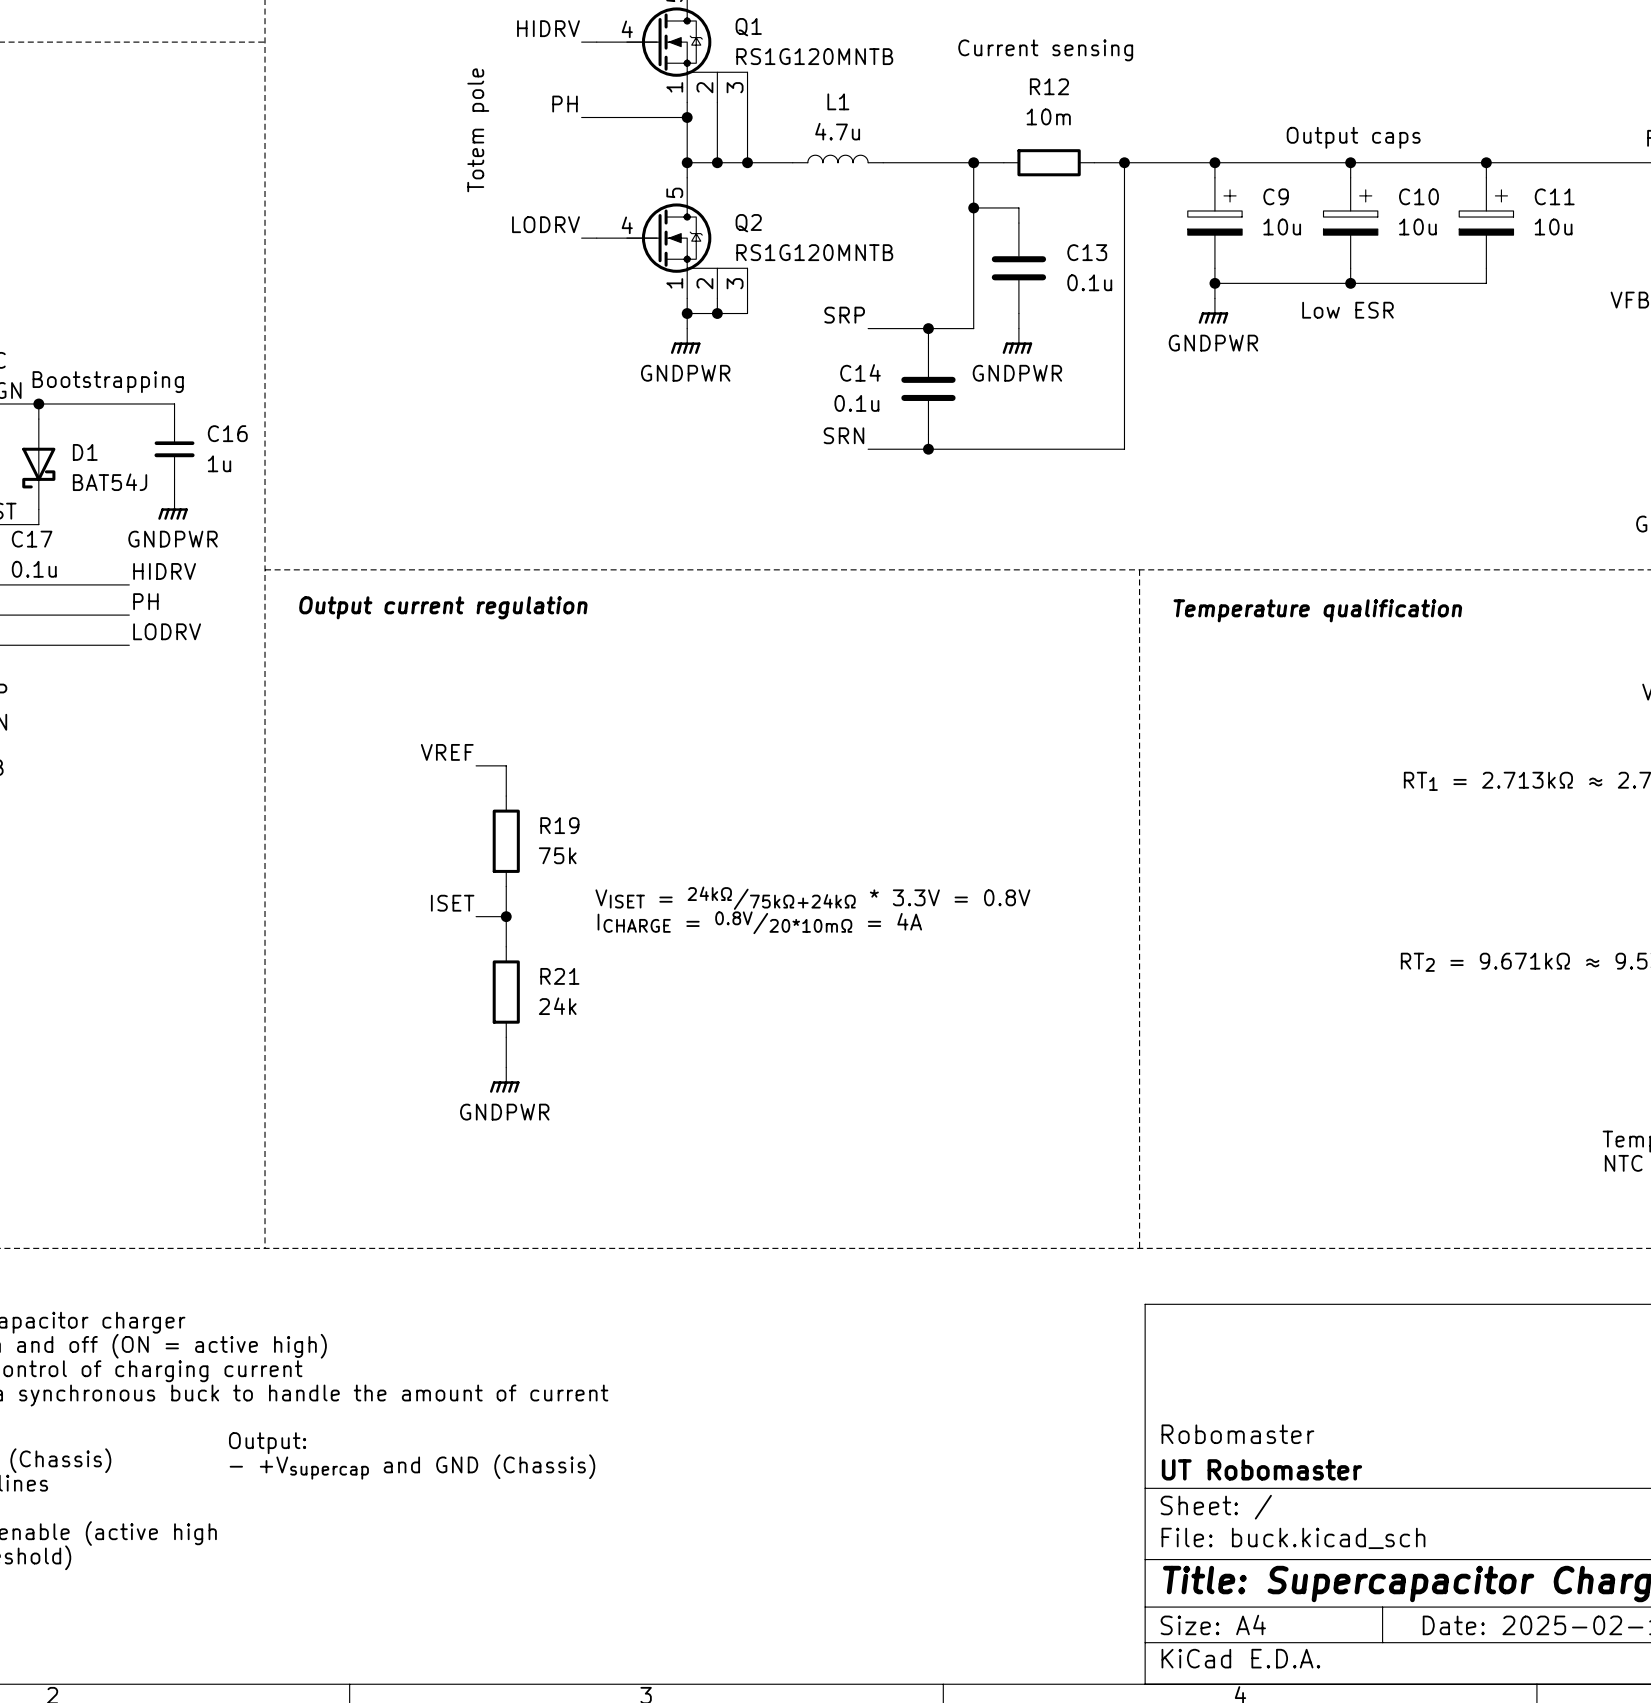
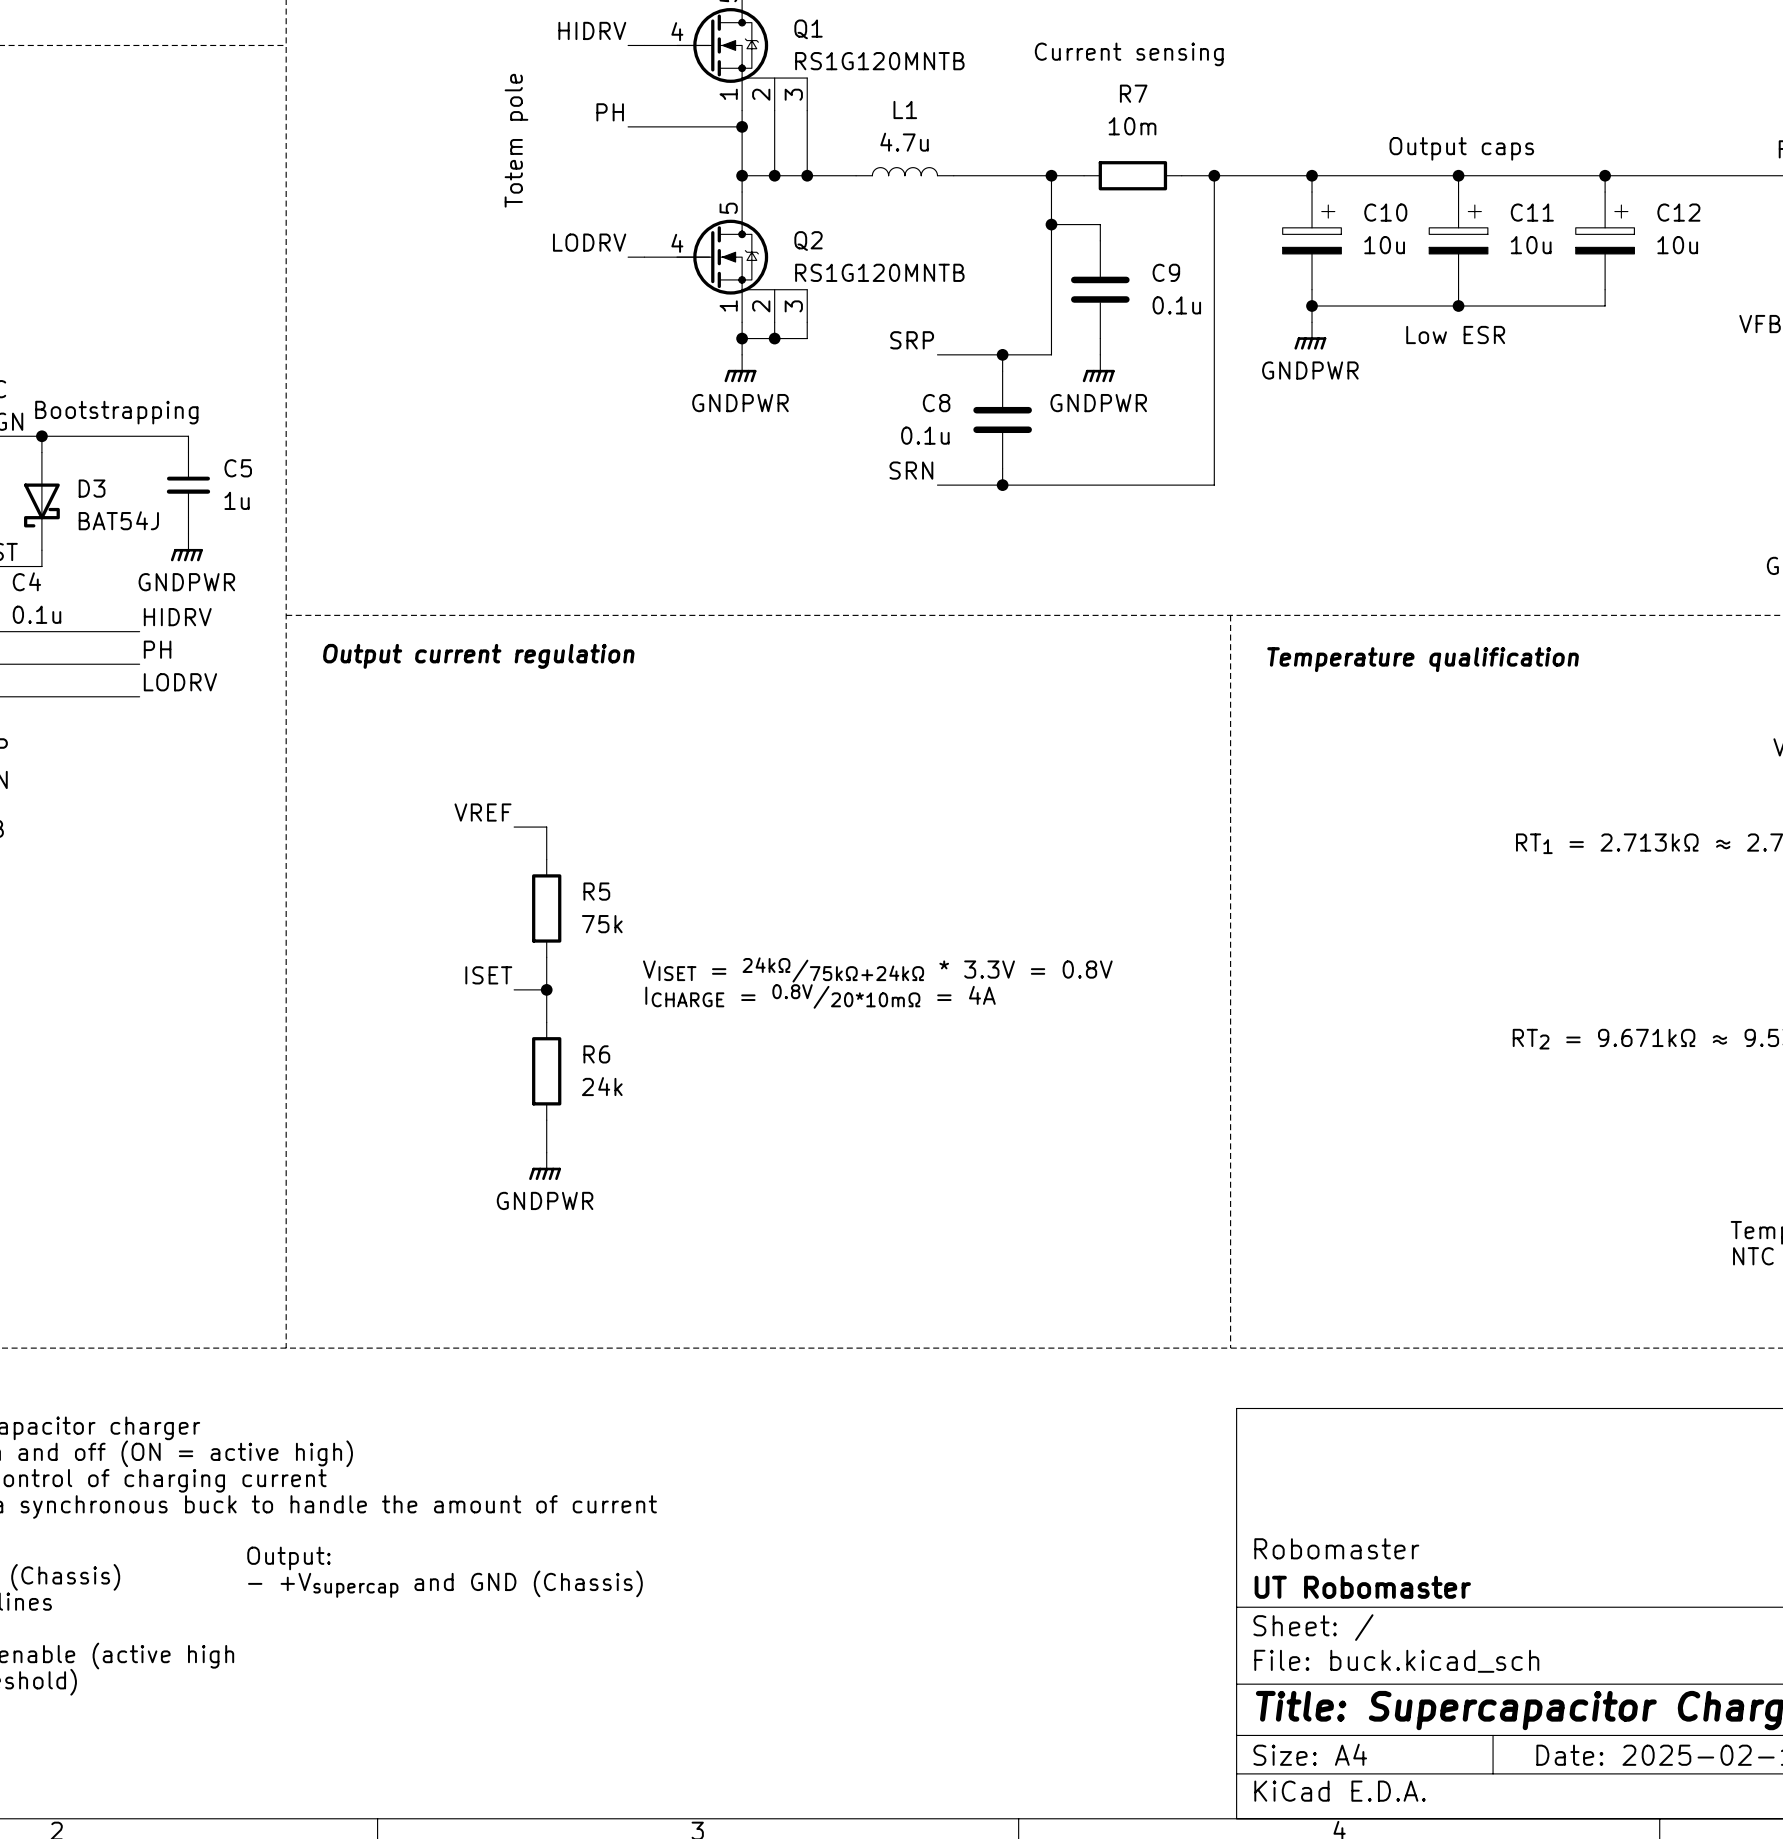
R12 name: R12 (1049, 86) -> R7 (1133, 93)
C9 name: C9 (1276, 196) -> C10 (1385, 212)
C10 name: C10 (1418, 196) -> C11 (1532, 212)
C11 name: C11 (1554, 196) -> C12 (1678, 212)
C13 name: C13 (1087, 252) -> C9 (1166, 272)
C14 name: C14 (860, 372) -> C8 (936, 403)
C16 name: C16 (227, 433) -> C5 (238, 468)
D1 name: D1 (85, 452) -> D3 (92, 488)
C17 name: C17 (32, 539) -> C4 (26, 581)
R19 name: R19 (559, 825) -> R5 (596, 891)
R21 name: R21 (559, 976) -> R6 (596, 1054)

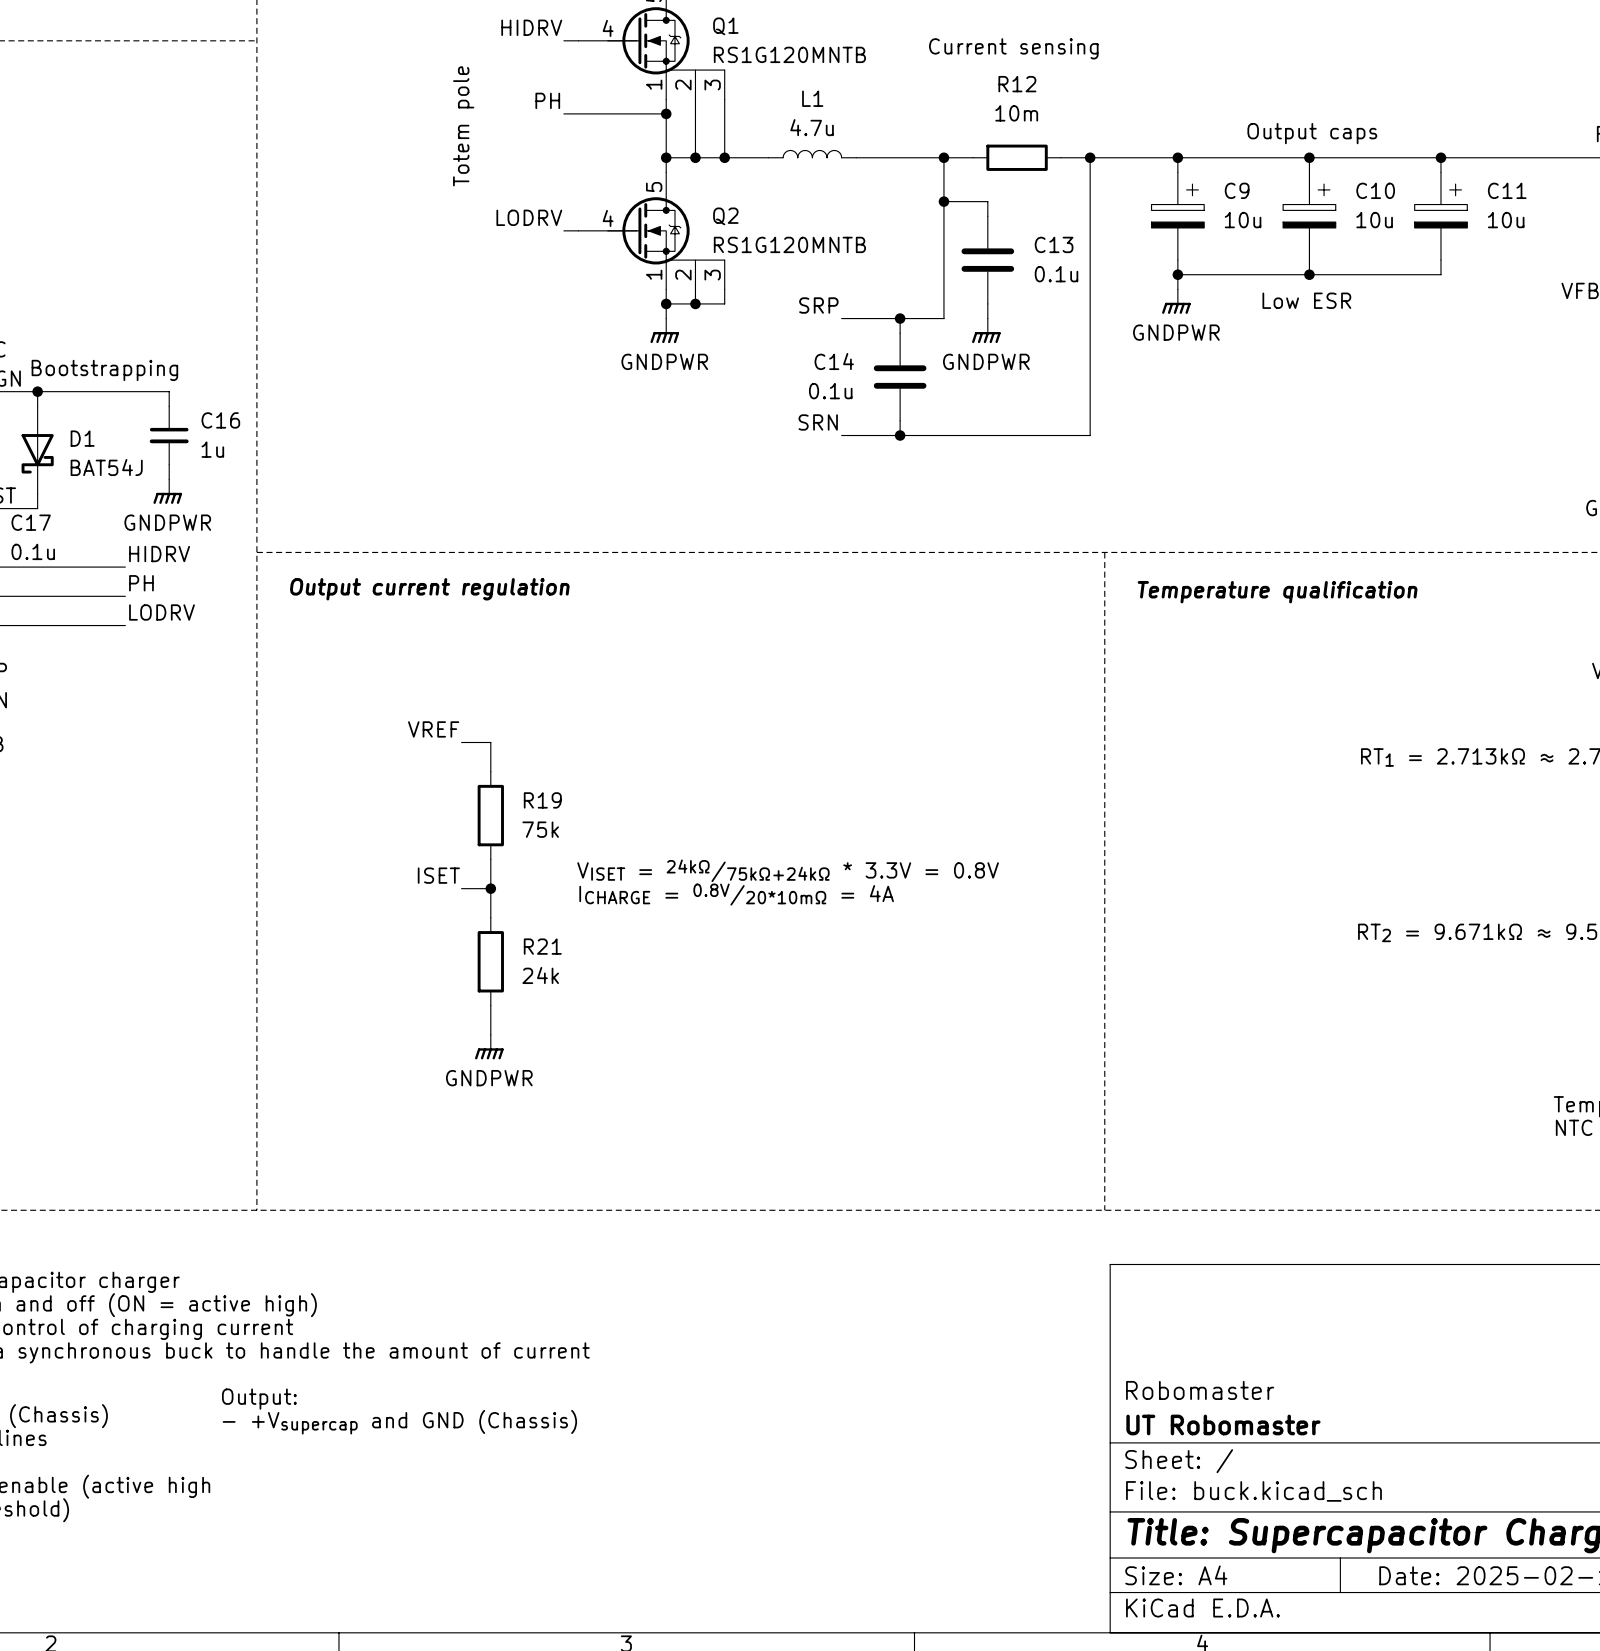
R7 name: R7 (1133, 93) -> R12 (1017, 84)
C10 name: C10 (1385, 212) -> C9 (1237, 190)
C11 name: C11 (1532, 212) -> C10 (1375, 190)
C12 name: C12 (1678, 212) -> C11 (1507, 190)
C9 name: C9 (1166, 272) -> C13 (1054, 244)
C8 name: C8 (936, 403) -> C14 (834, 361)
C5 name: C5 (238, 468) -> C16 (220, 420)
D3 name: D3 (92, 488) -> D1 (82, 438)
C4 name: C4 (26, 581) -> C17 (31, 522)
R5 name: R5 (596, 891) -> R19 (542, 800)
R6 name: R6 (596, 1054) -> R21 (542, 946)

